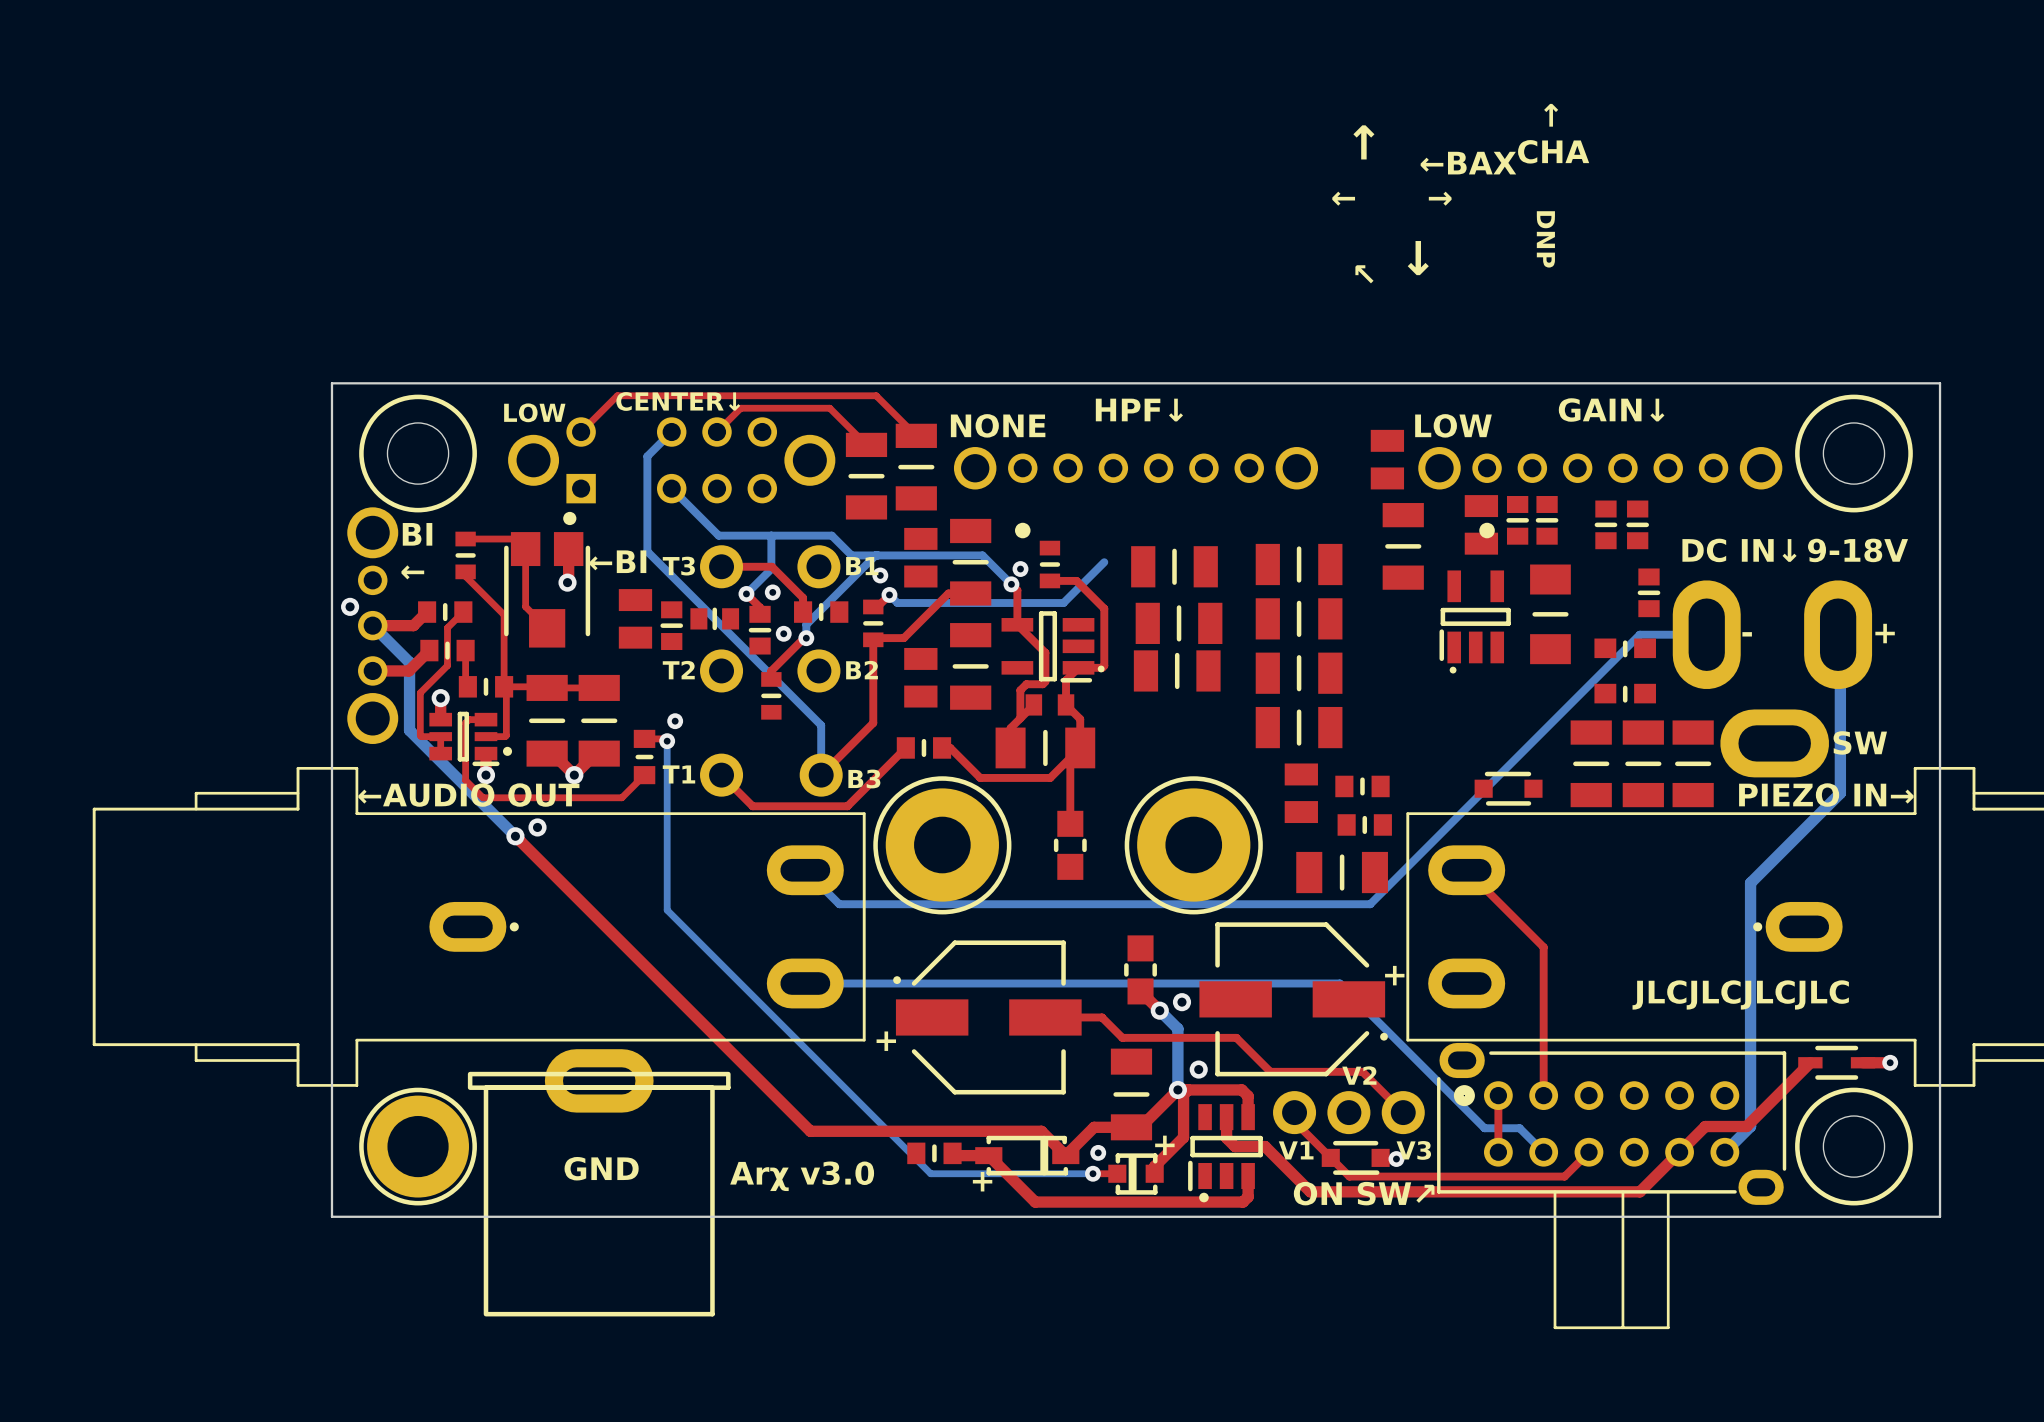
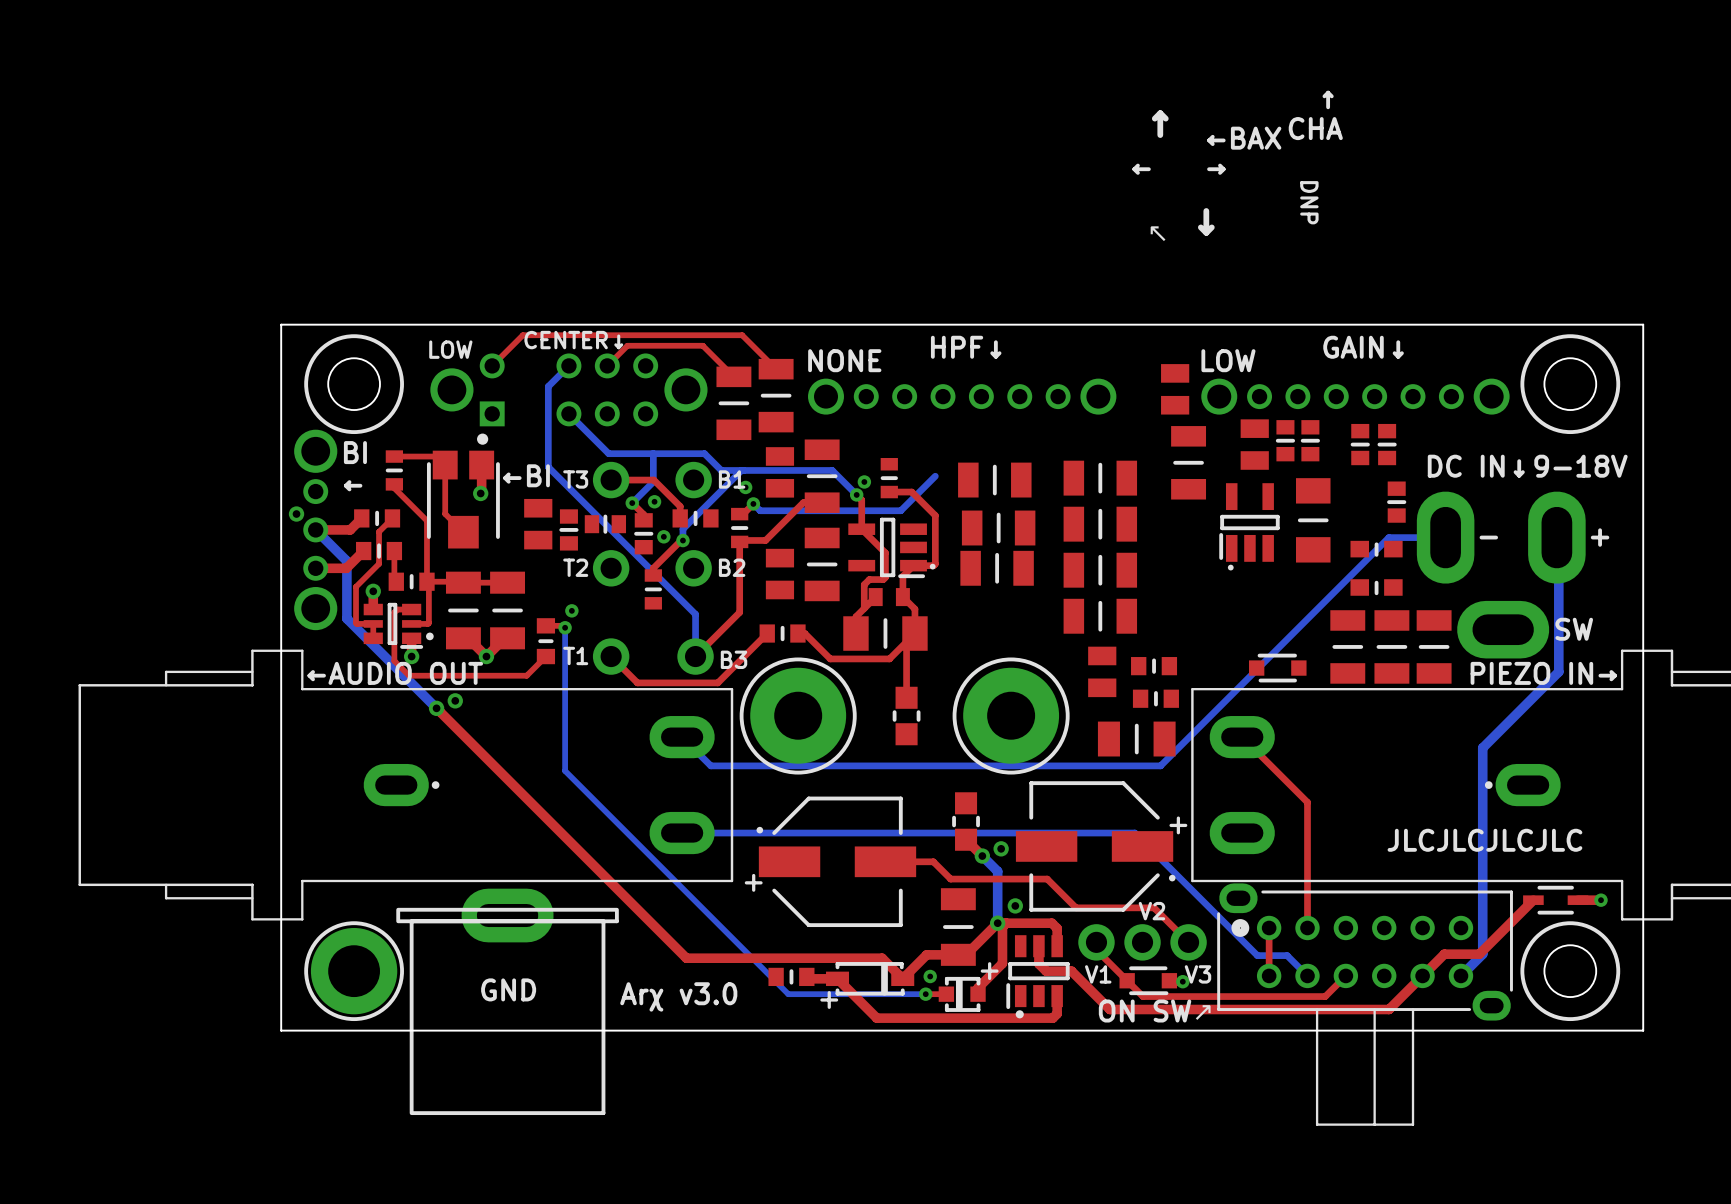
part: (1136, 492) -> none
part: (1600, 492) -> none

